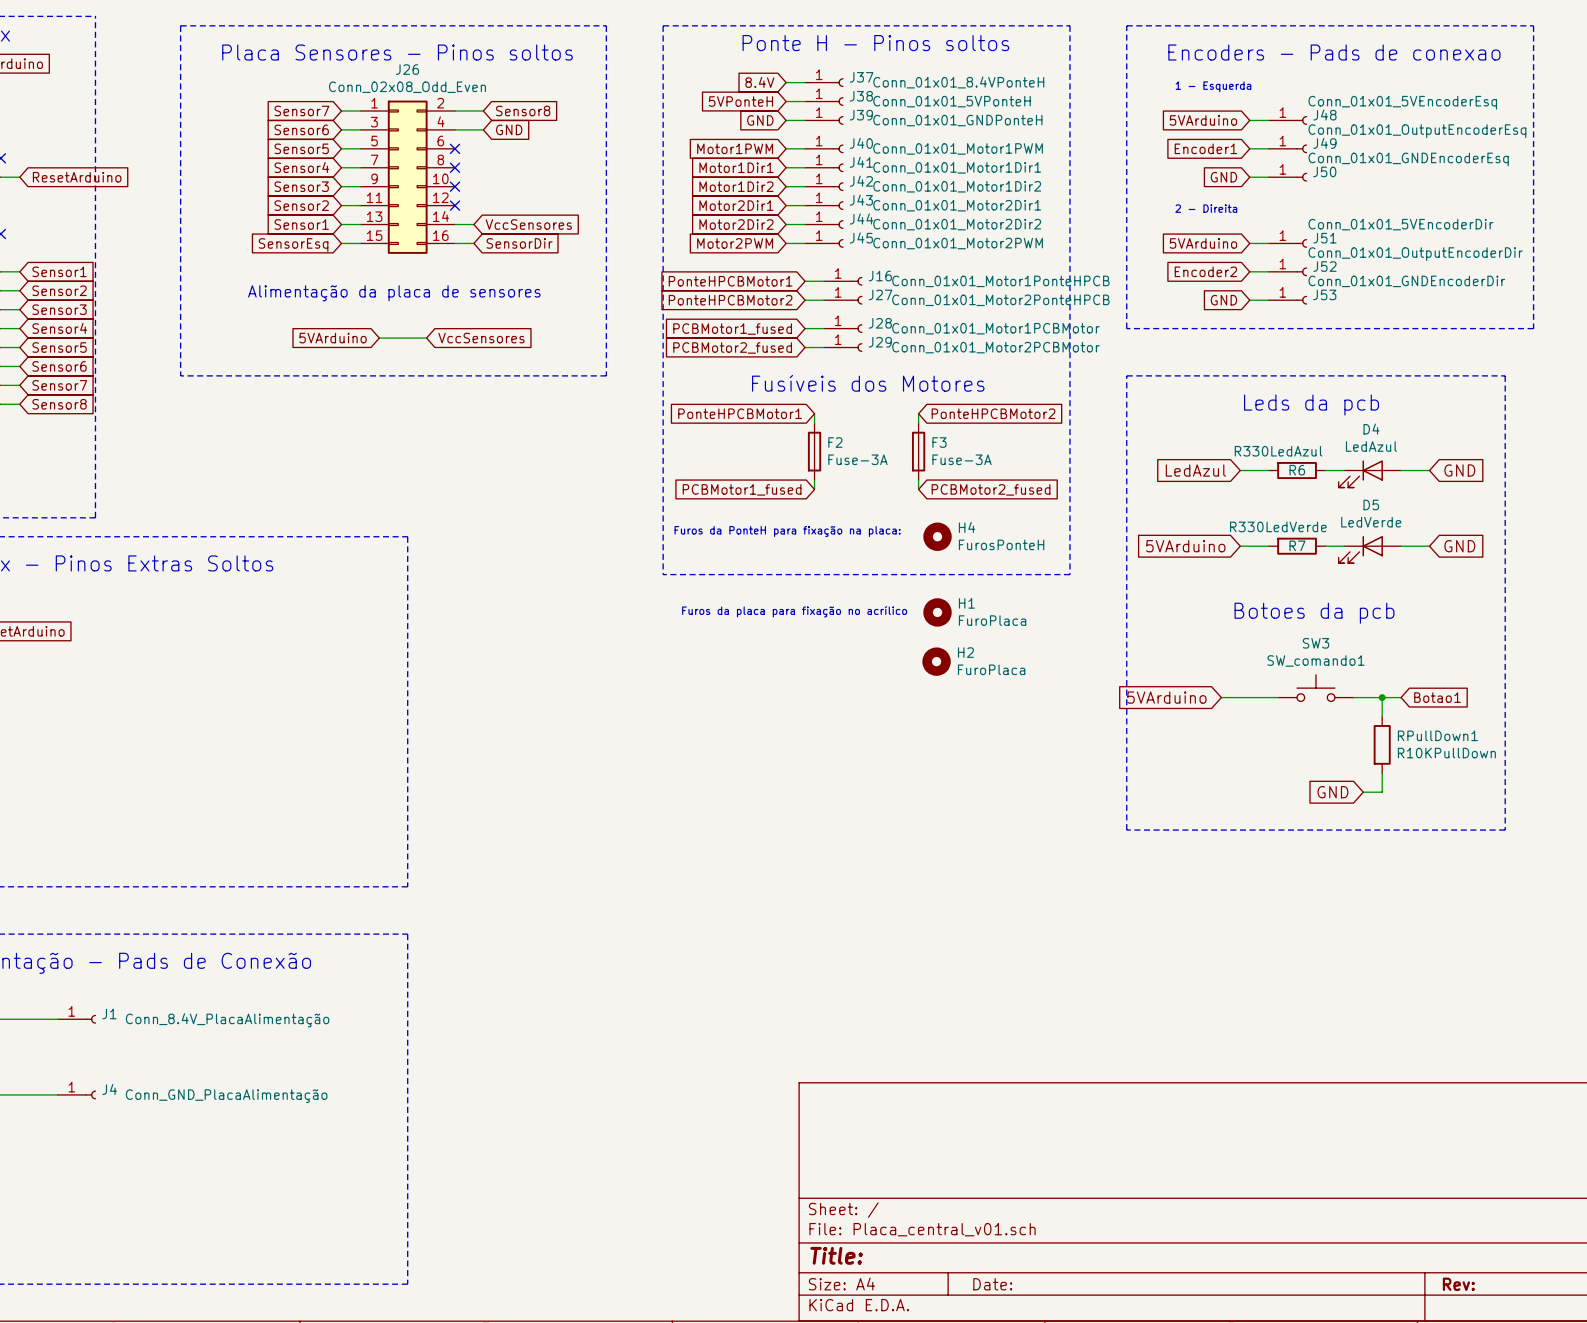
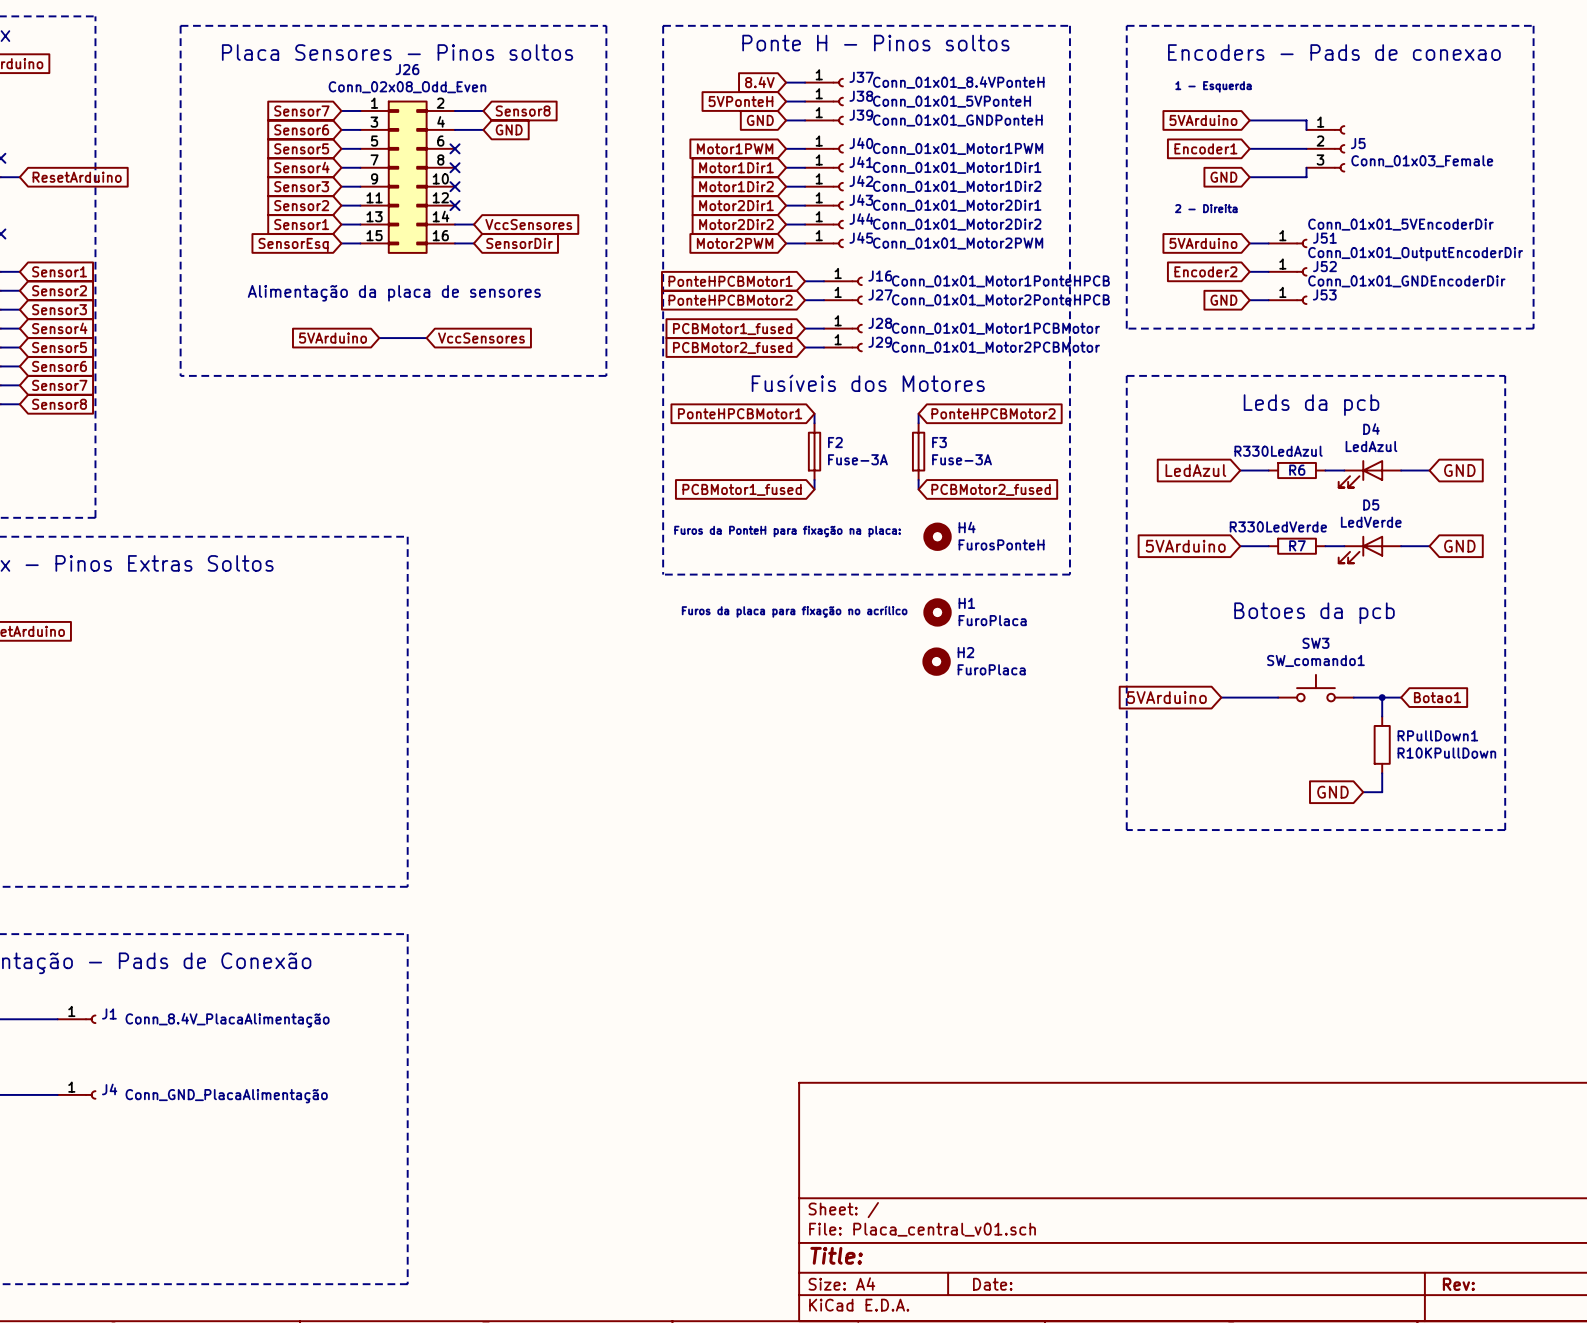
J48: Conn_01x01_5VEncoderEsq (1287, 120) -> none
J49: Conn_01x01_OutputEncoderEsq (1287, 148) -> none
J5: none -> Conn_01x03_Female (1325, 148)
J50: Conn_01x01_GNDEncoderEsq (1287, 177) -> none

